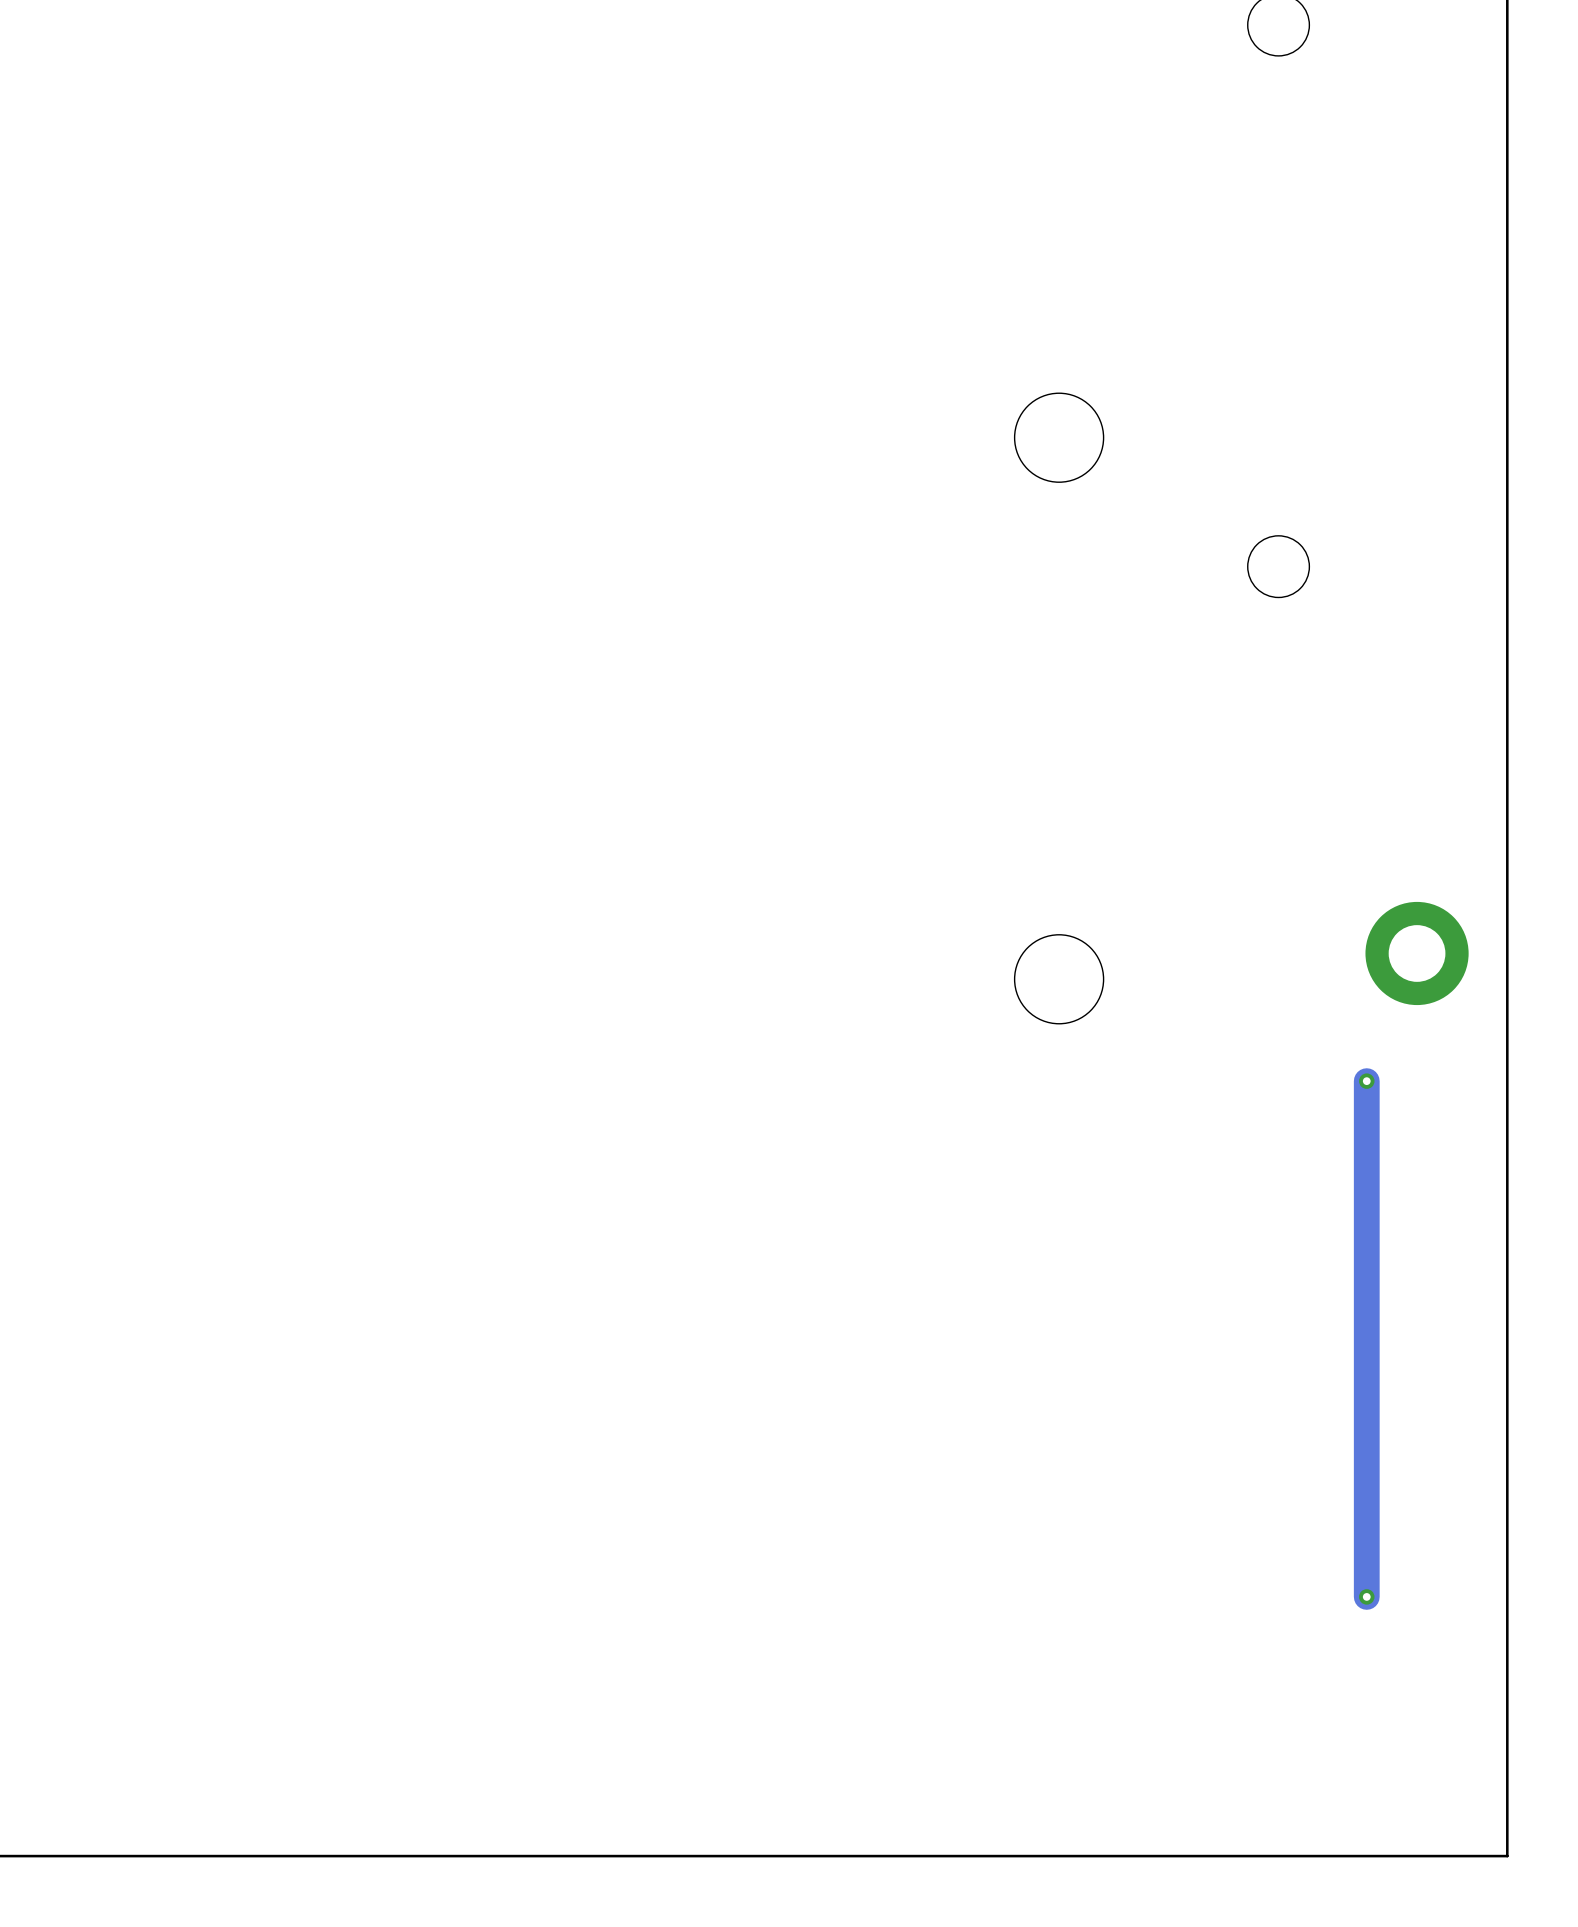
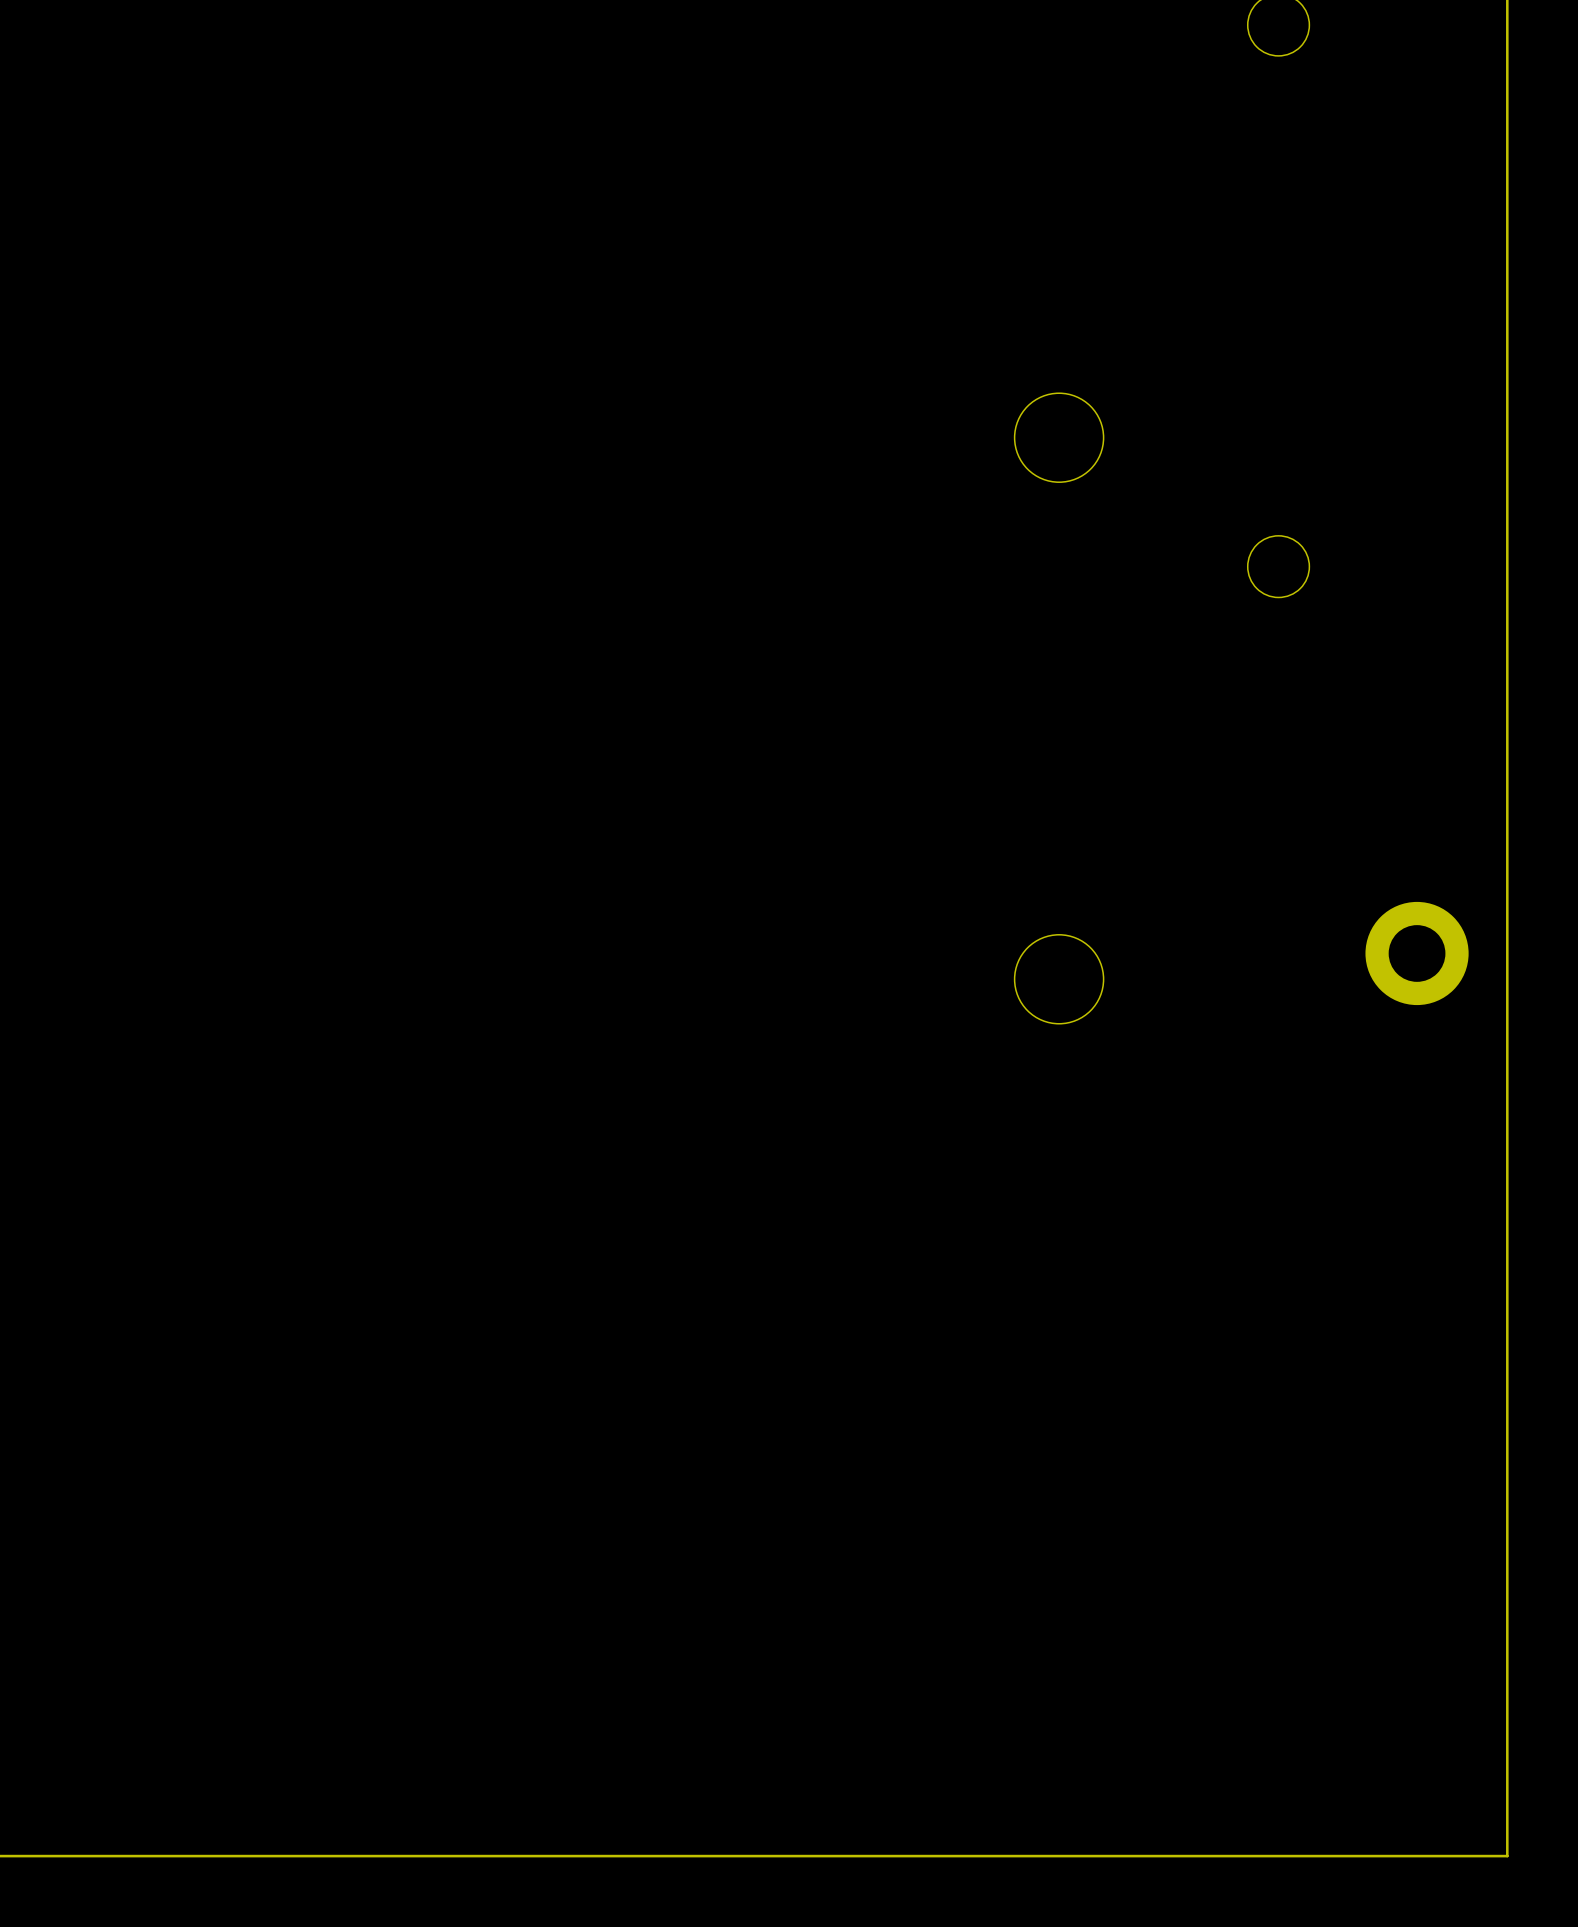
track: (1366, 1081) (1366, 1596) -> none
via: (1366, 1081) -> none
via: (1366, 1596) -> none

